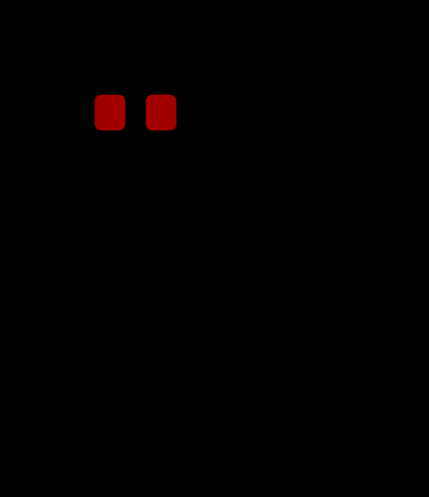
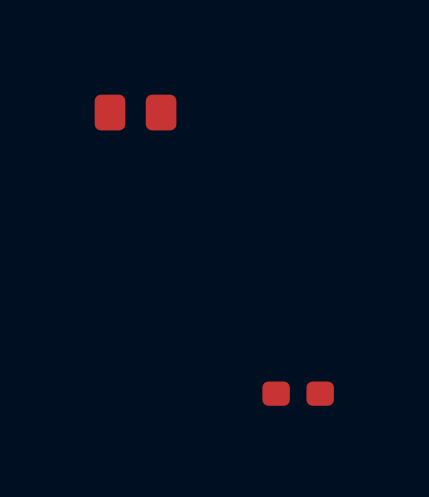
part: none -> (298, 393)

